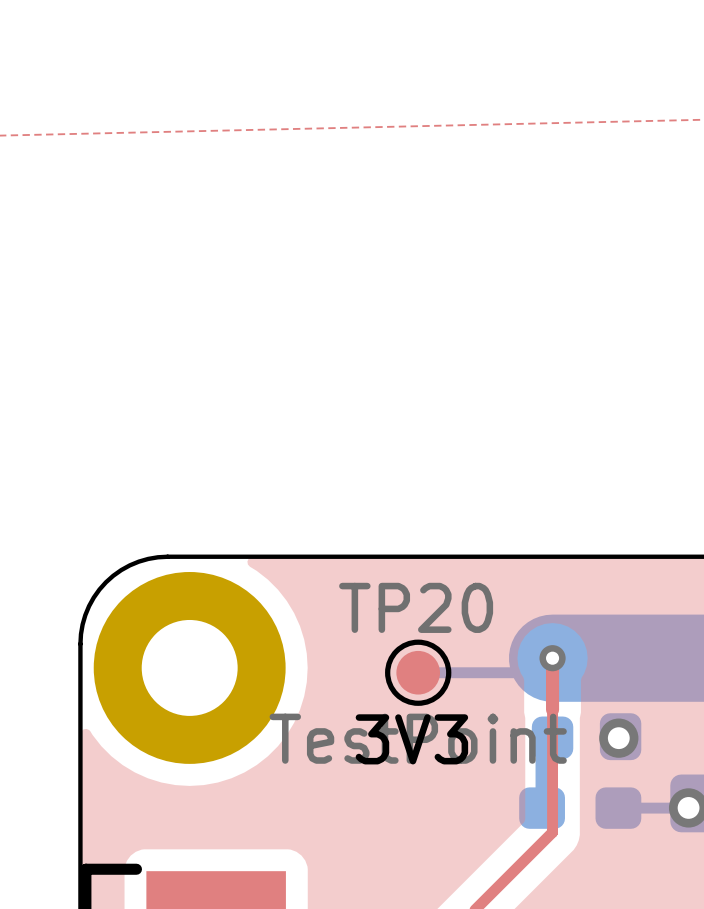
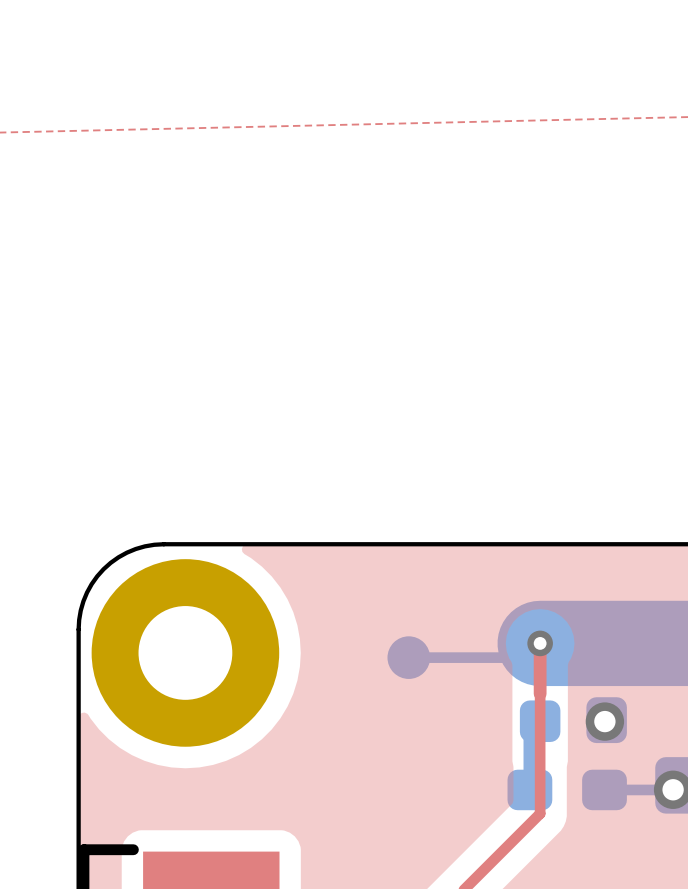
TP20 side: top (418, 672) -> bottom (408, 657)
text: 3V3 (411, 739) -> none

